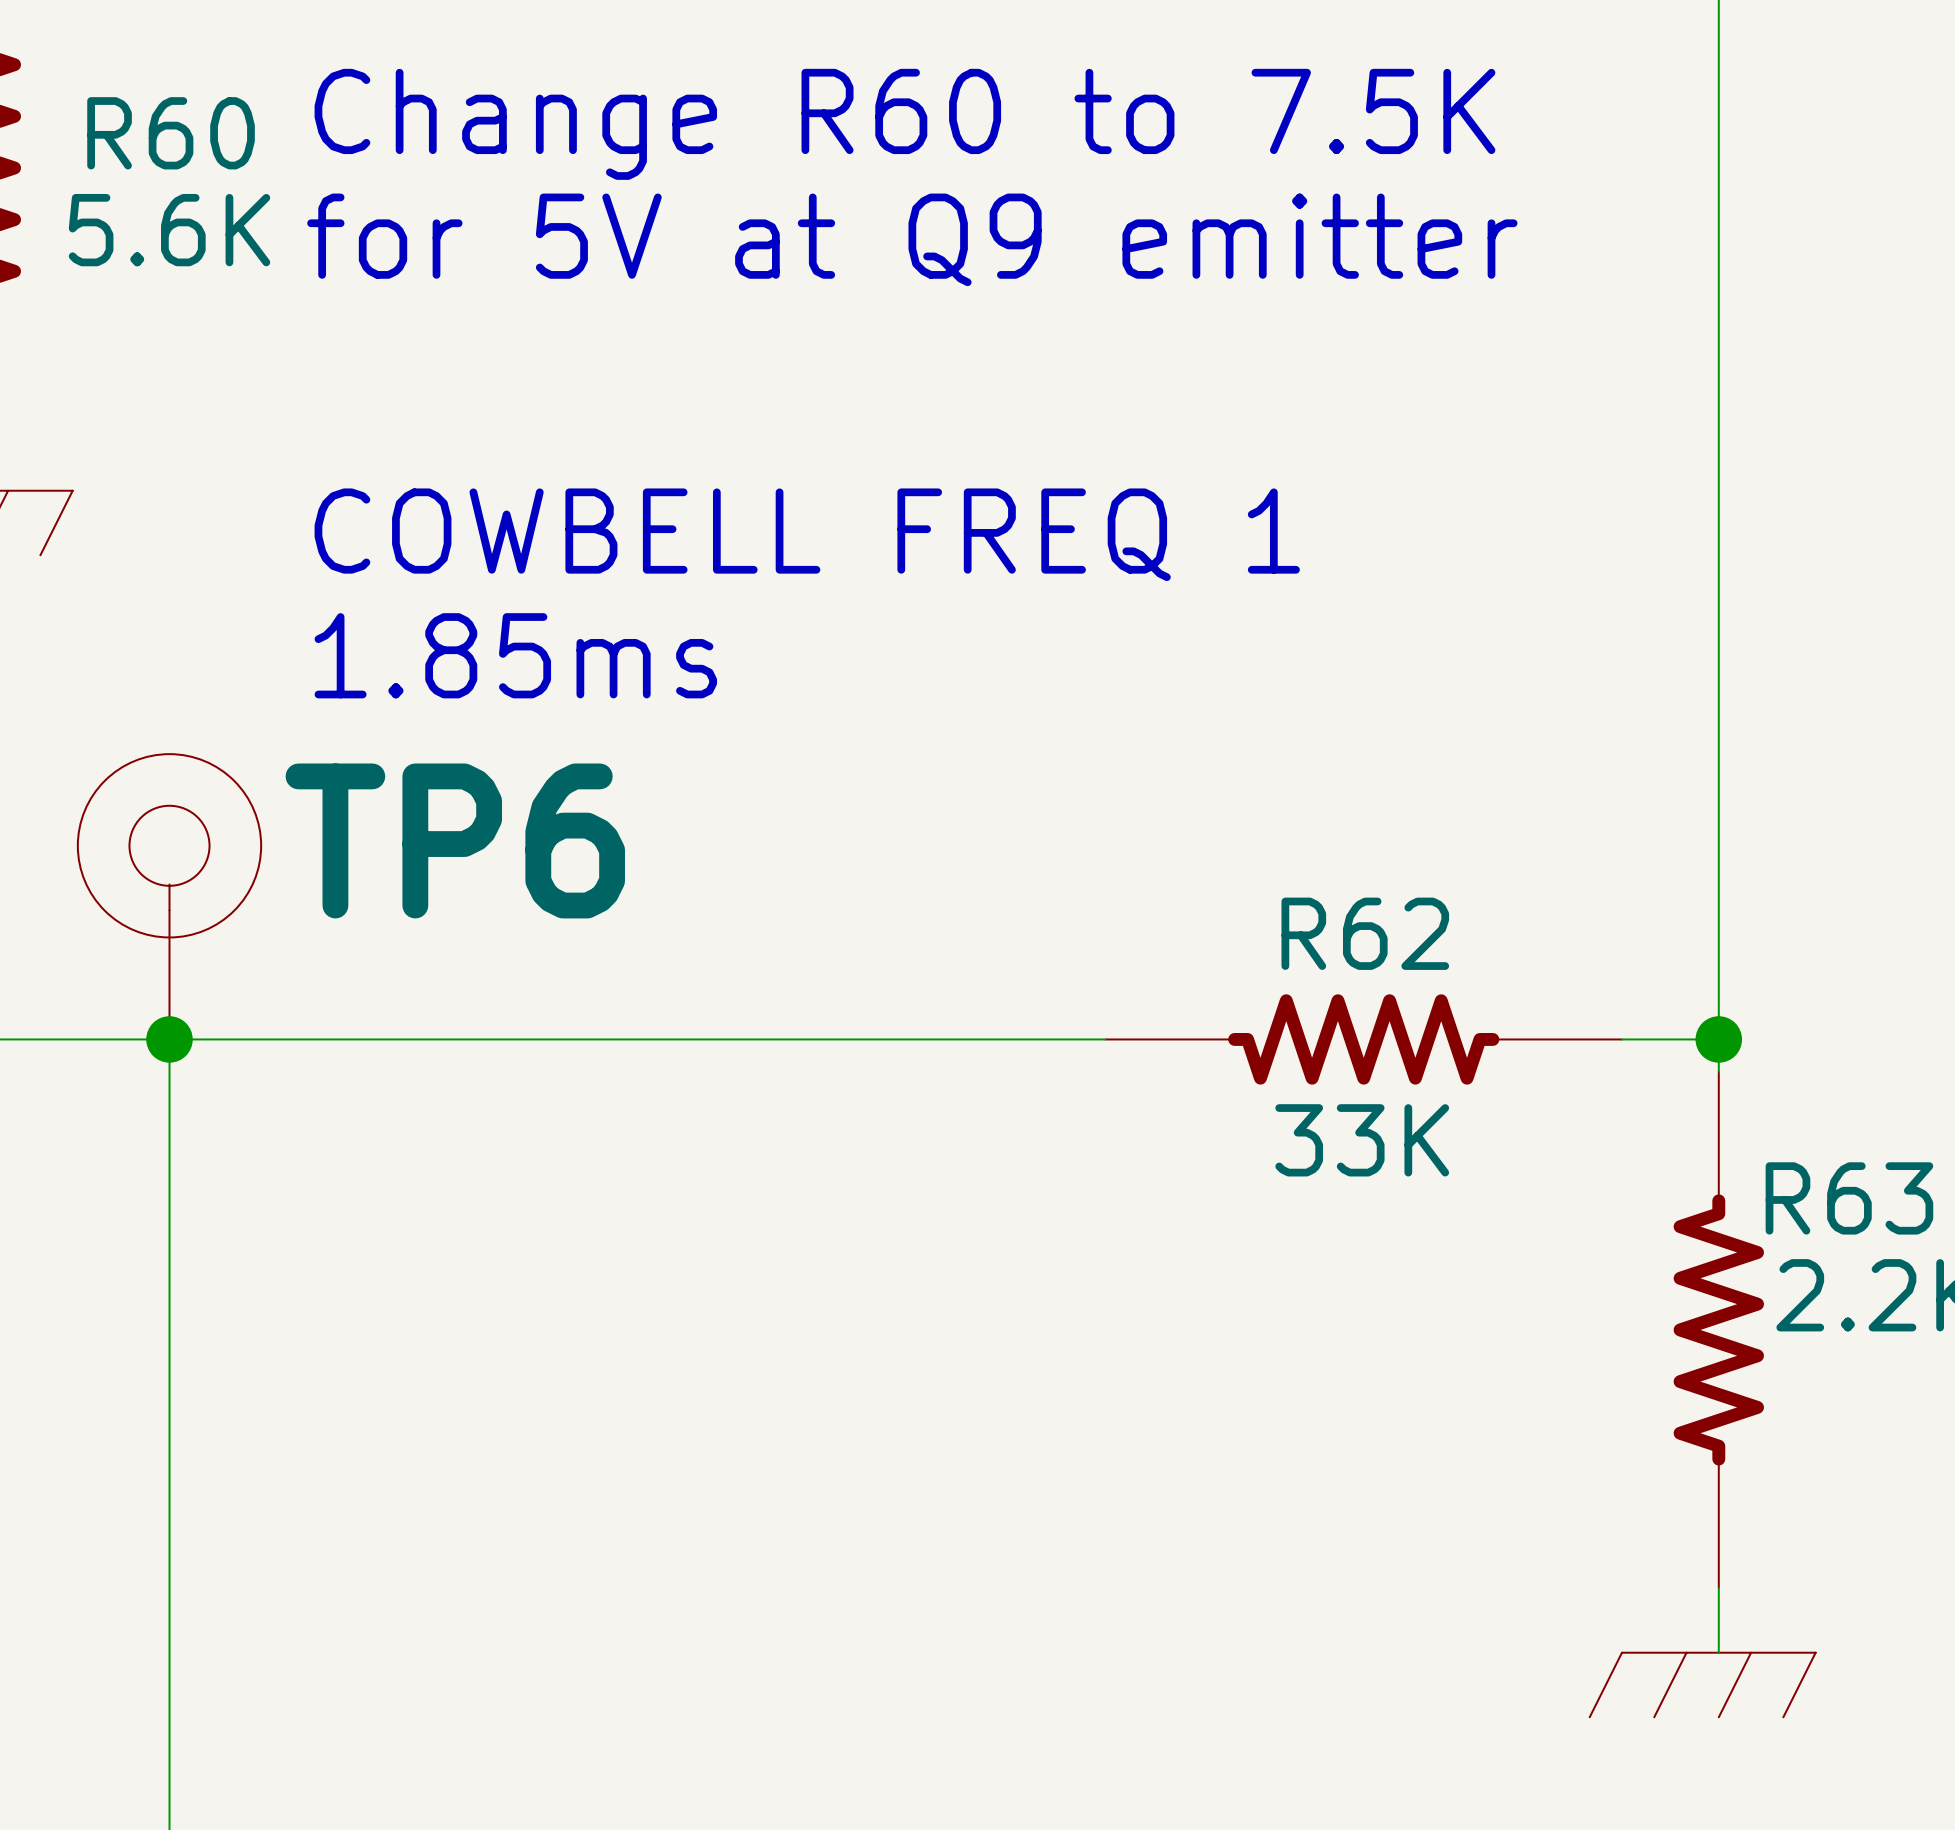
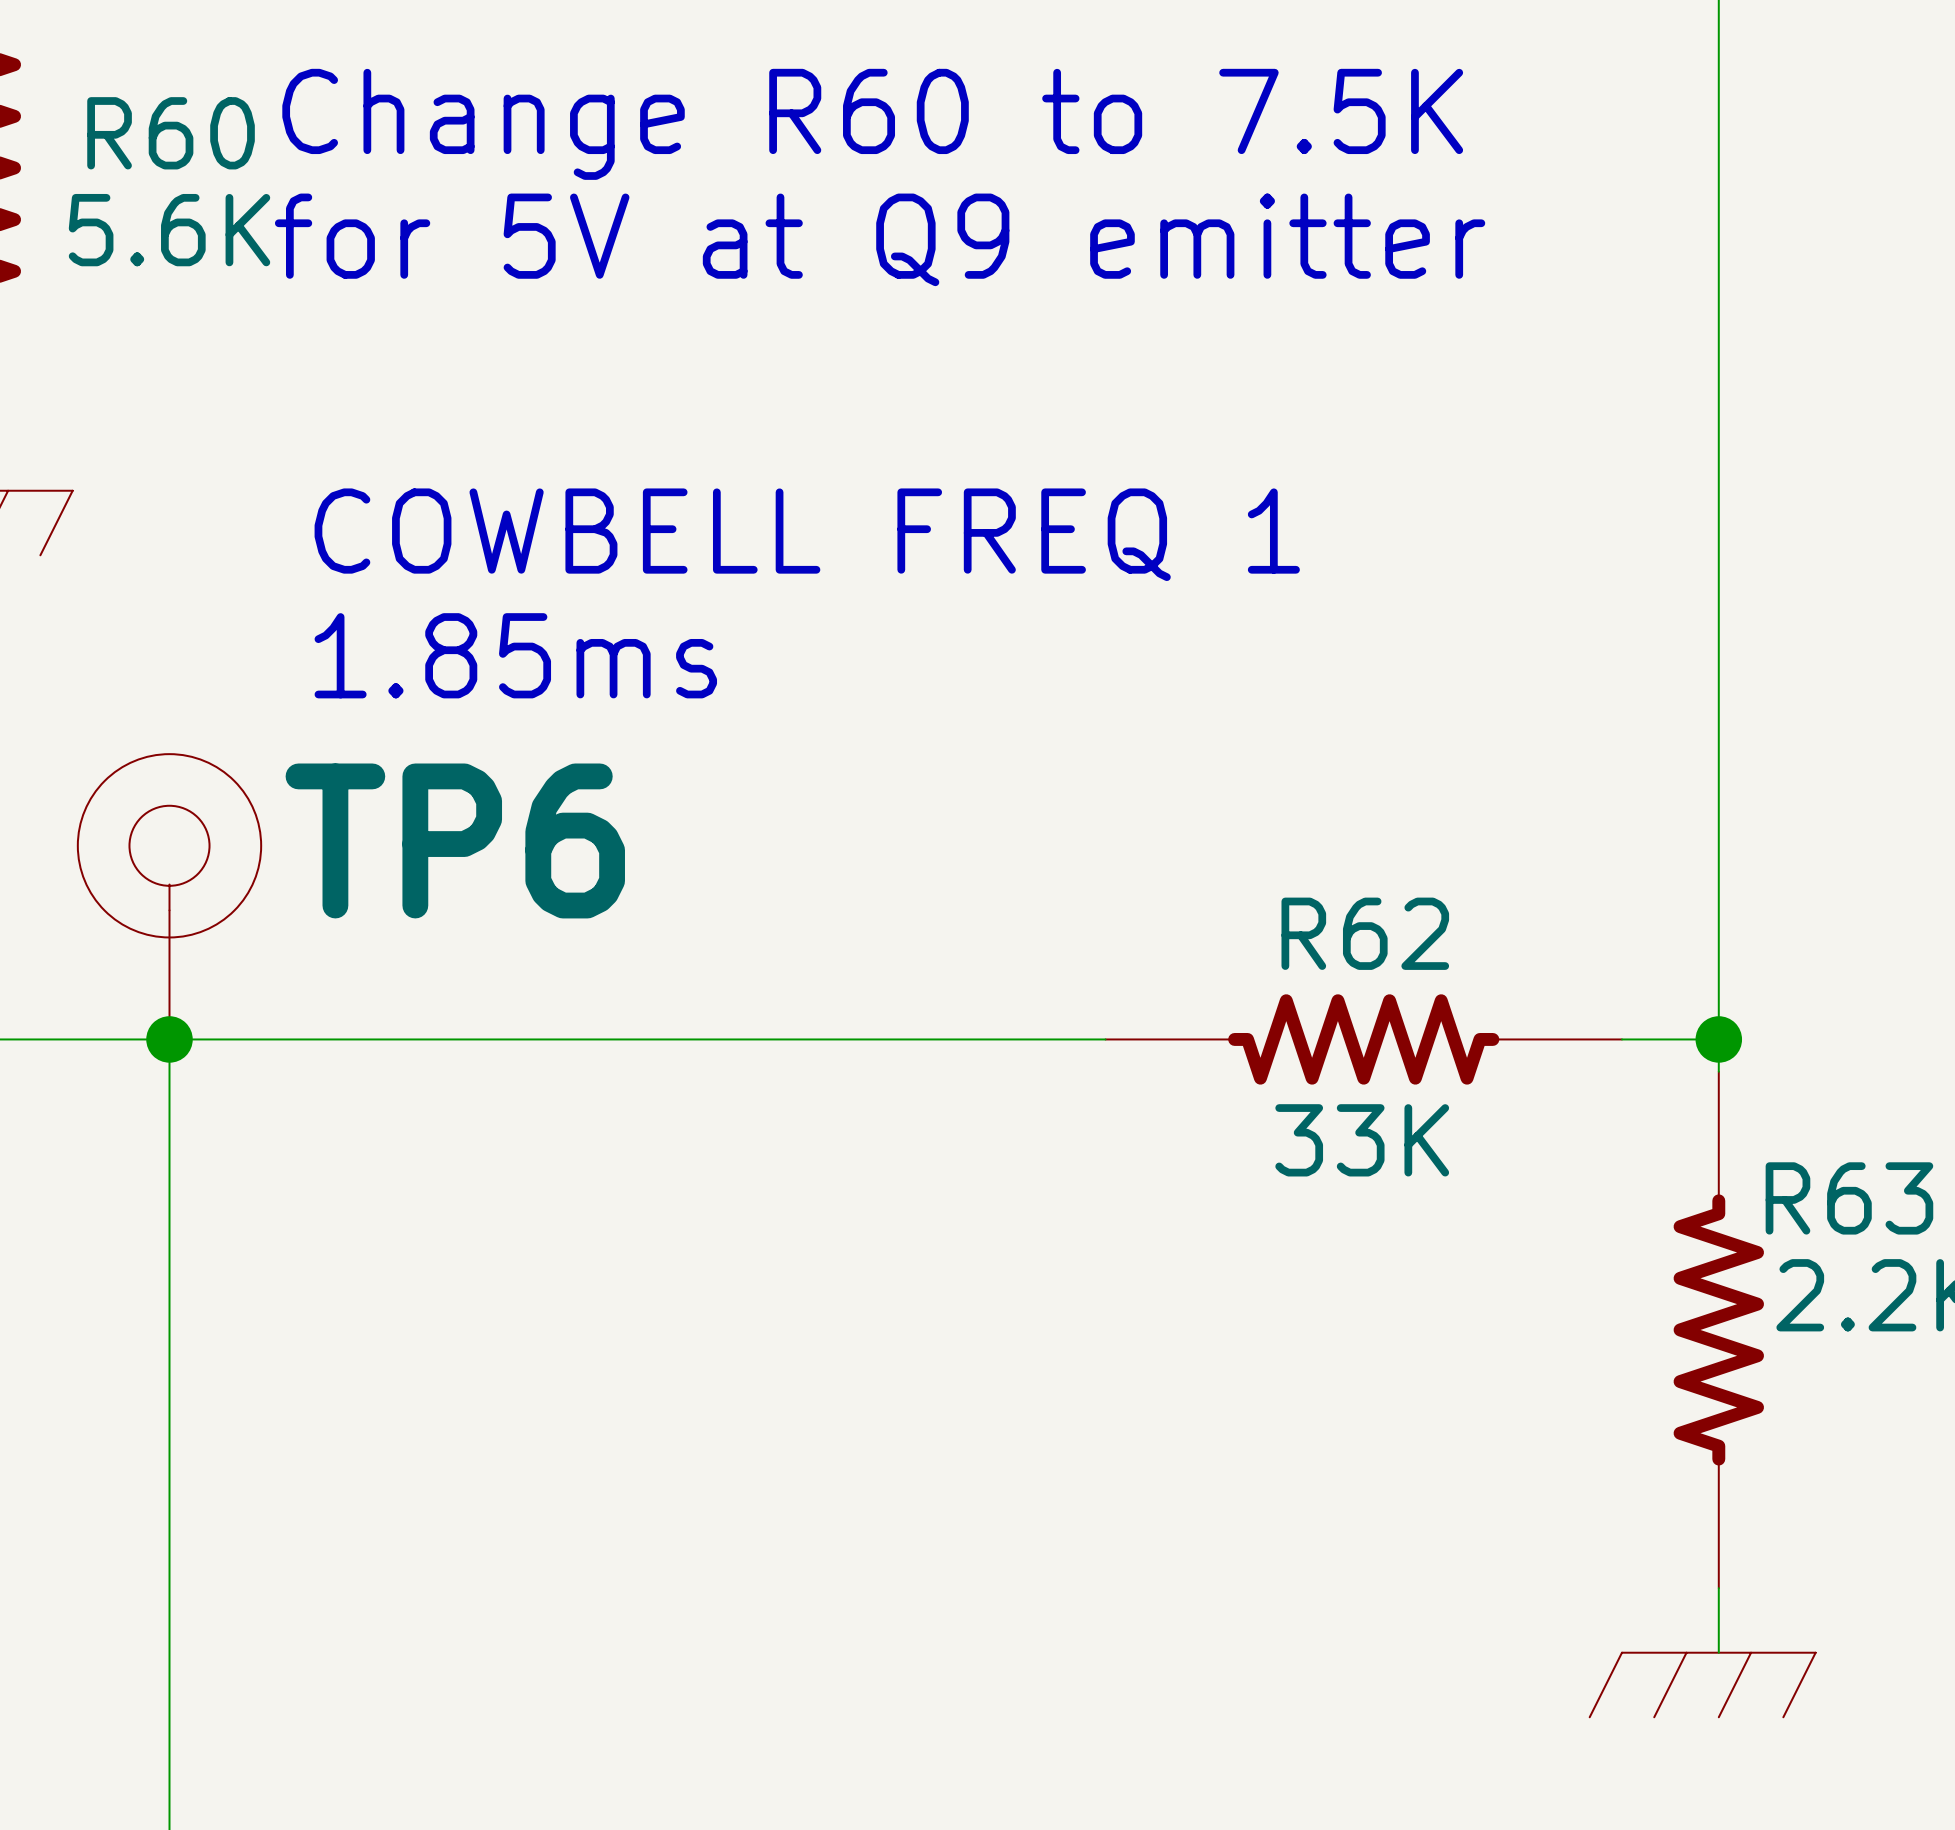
text position: Change R60 to 7.5K (904, 124) -> Change R60 to 7.5K (872, 124)
text position: for 5V at Q9 emitter (912, 239) -> for 5V at Q9 emitter (880, 239)

